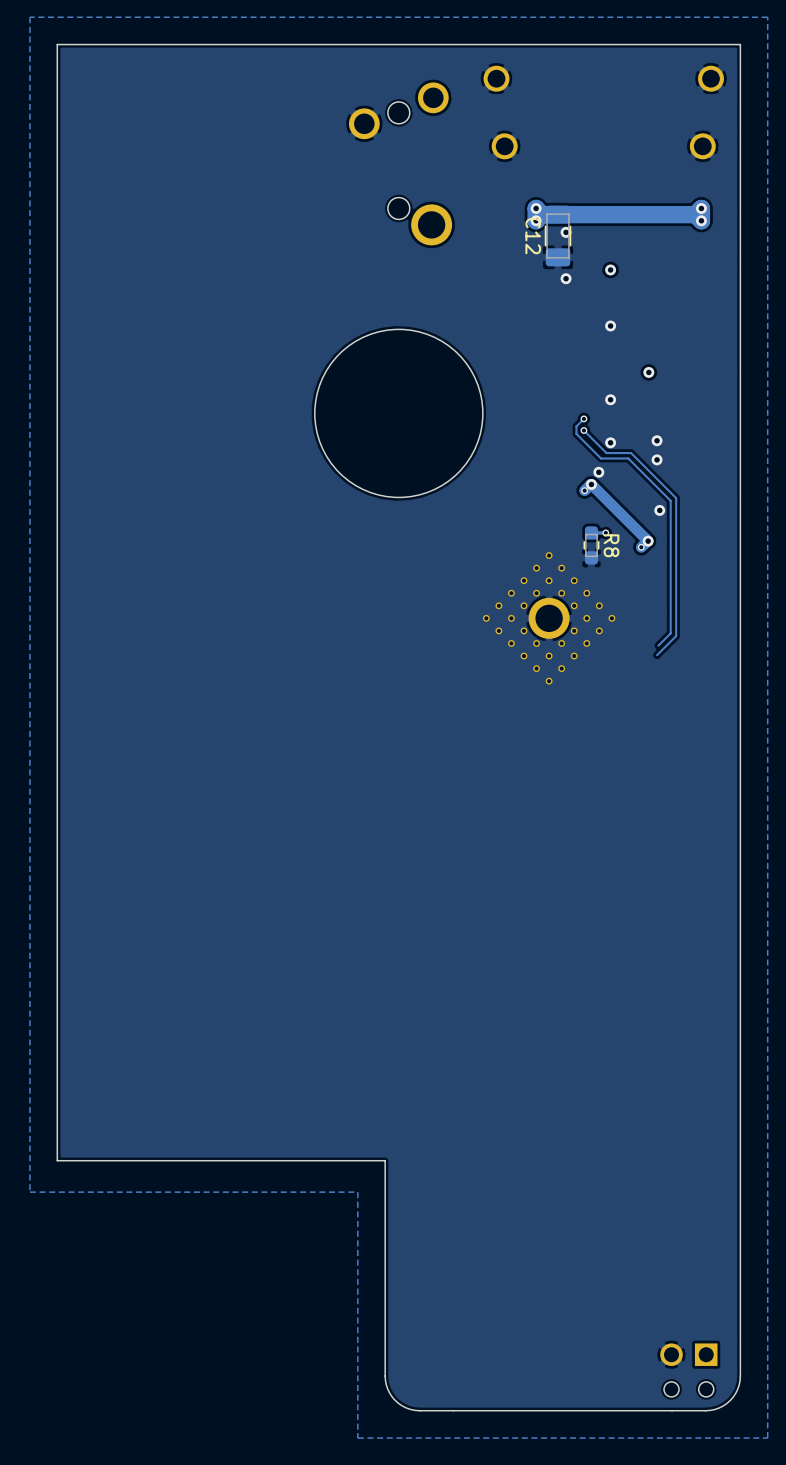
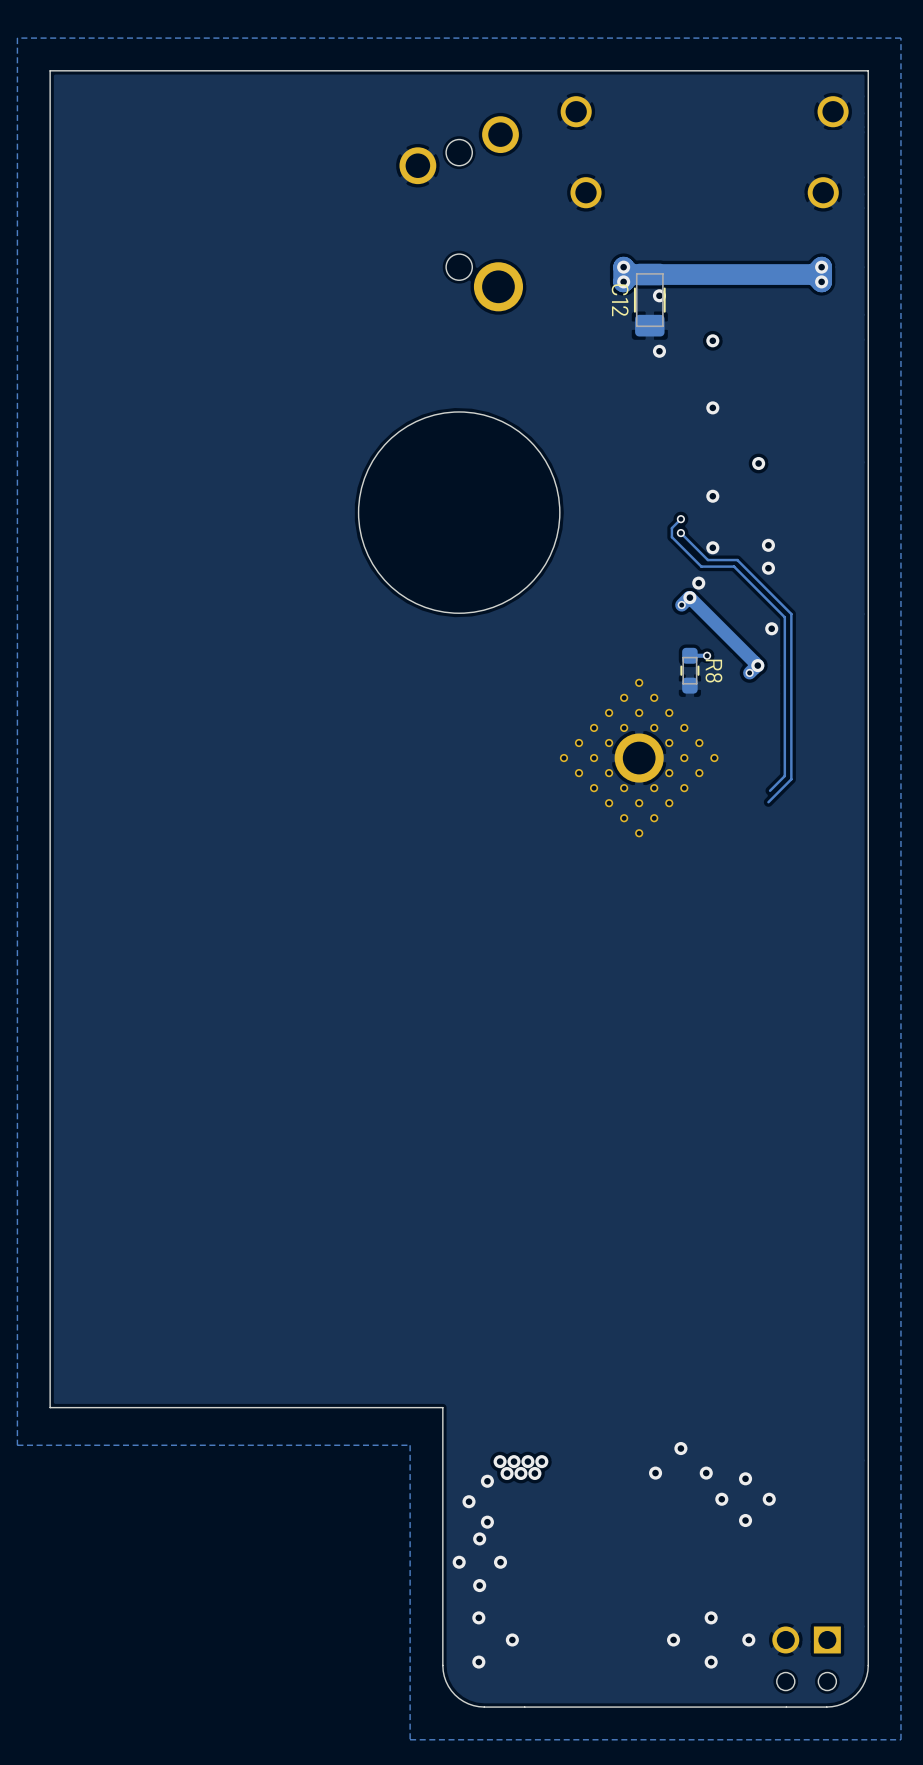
via: none -> (680, 1448)
via: none -> (500, 1461)
via: none -> (514, 1461)
via: none -> (527, 1461)
via: none -> (541, 1461)
via: none -> (507, 1473)
via: none -> (520, 1473)
via: none -> (534, 1473)
via: none -> (655, 1473)
via: none -> (706, 1473)
via: none -> (745, 1478)
via: none -> (487, 1481)
via: none -> (721, 1499)
via: none -> (769, 1499)
via: none -> (469, 1501)
via: none -> (745, 1520)
via: none -> (487, 1522)
via: none -> (479, 1538)
via: none -> (459, 1562)
via: none -> (500, 1562)
via: none -> (479, 1585)
via: none -> (478, 1617)
via: none -> (711, 1617)
via: none -> (512, 1639)
via: none -> (673, 1639)
via: none -> (748, 1639)
via: none -> (478, 1662)
via: none -> (711, 1662)

